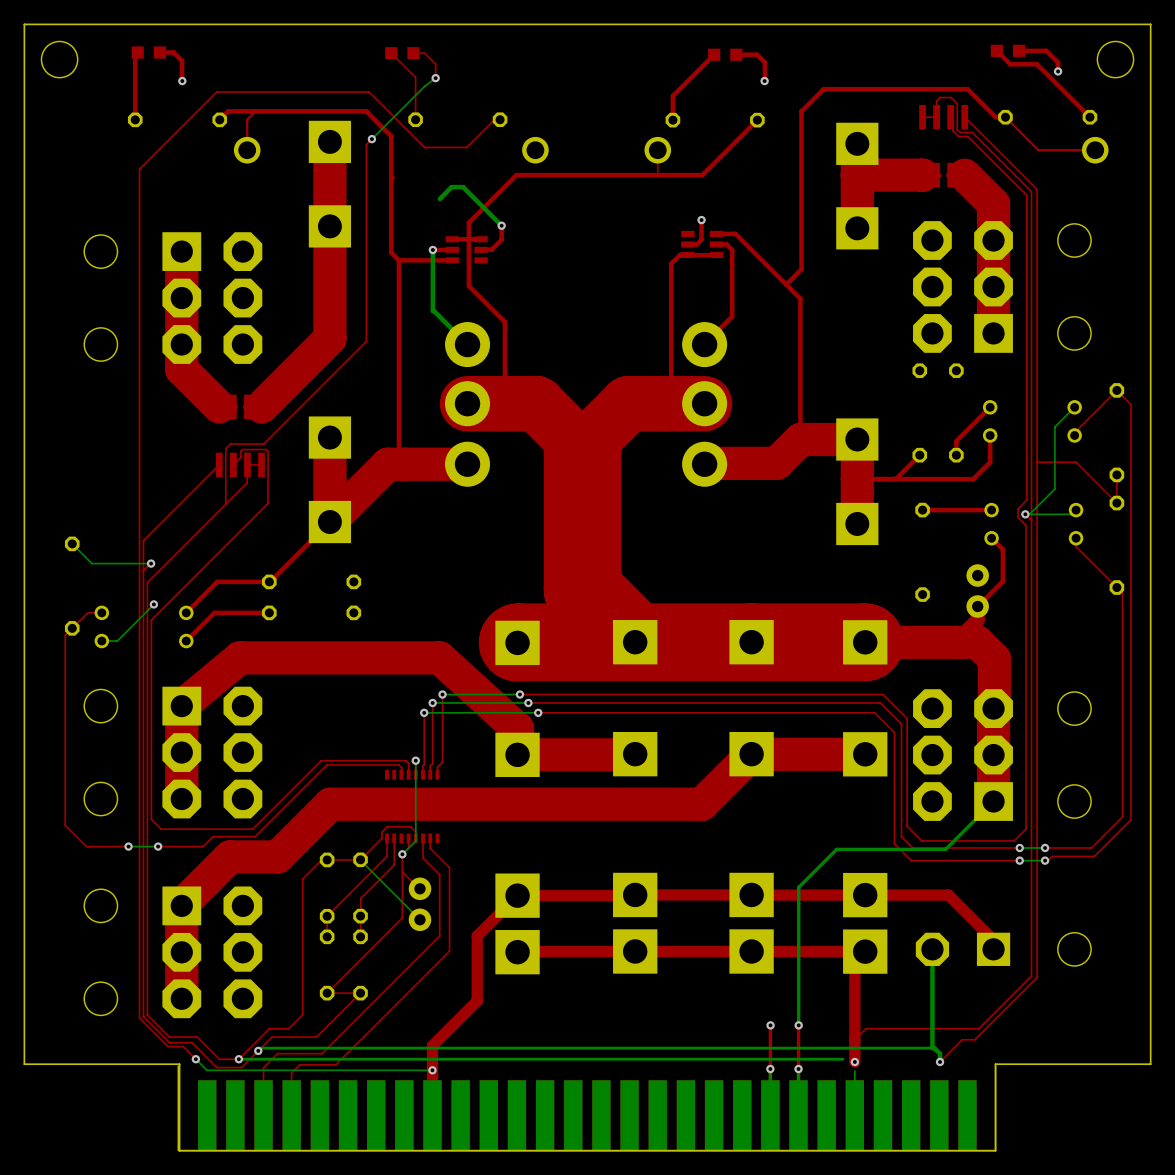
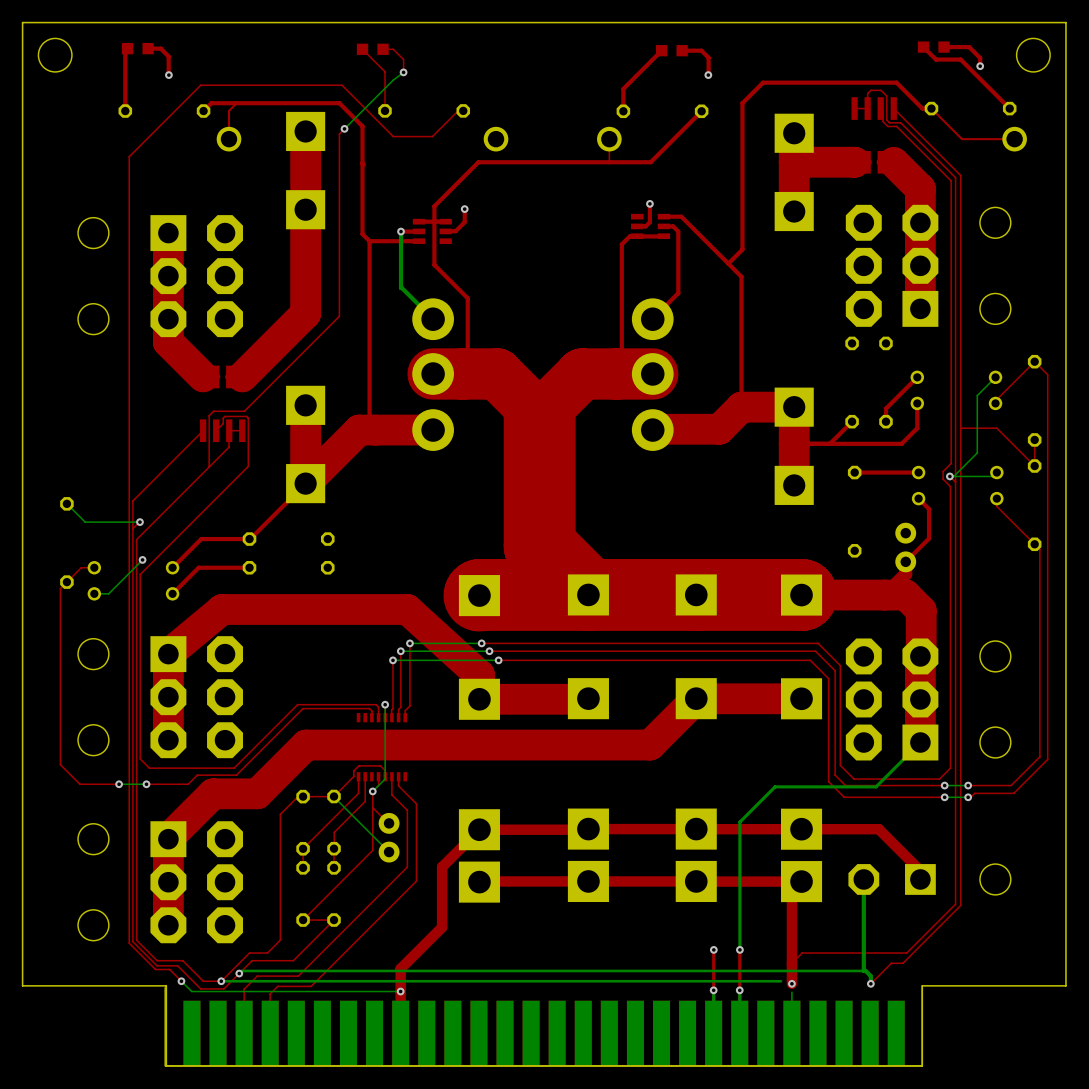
bottom track: (439, 198) (451, 187) (463, 187) (501, 225) -> none

